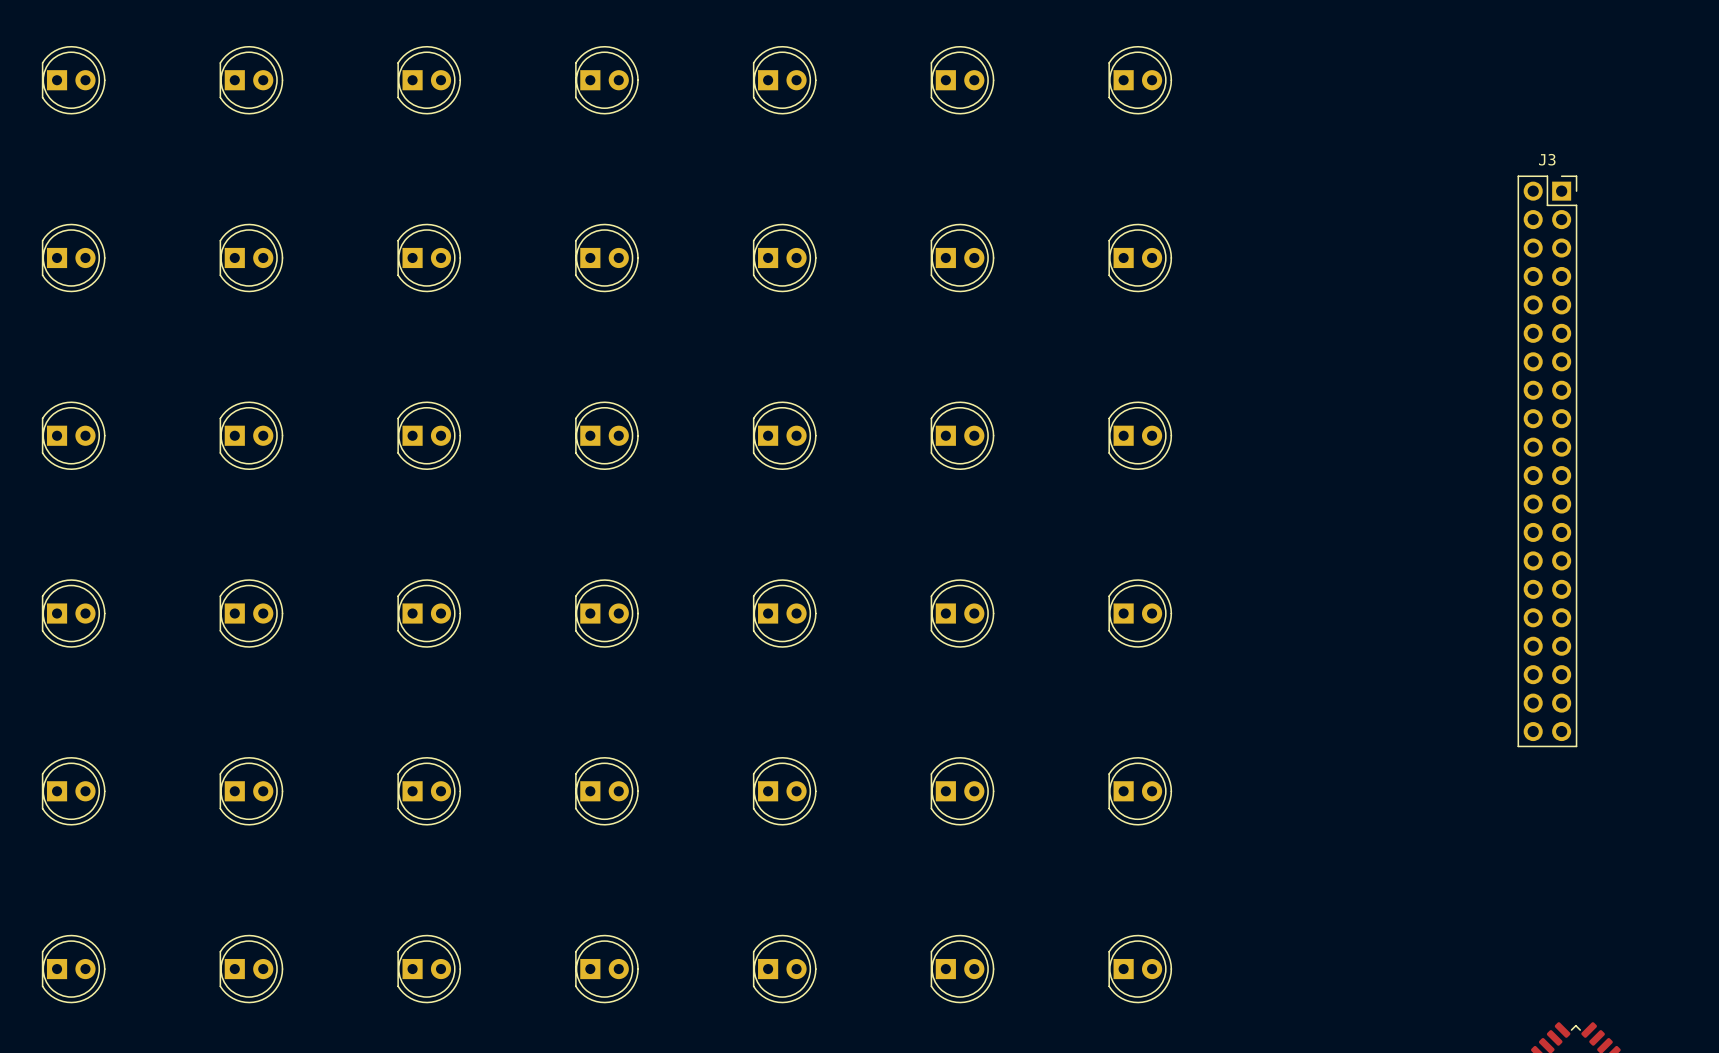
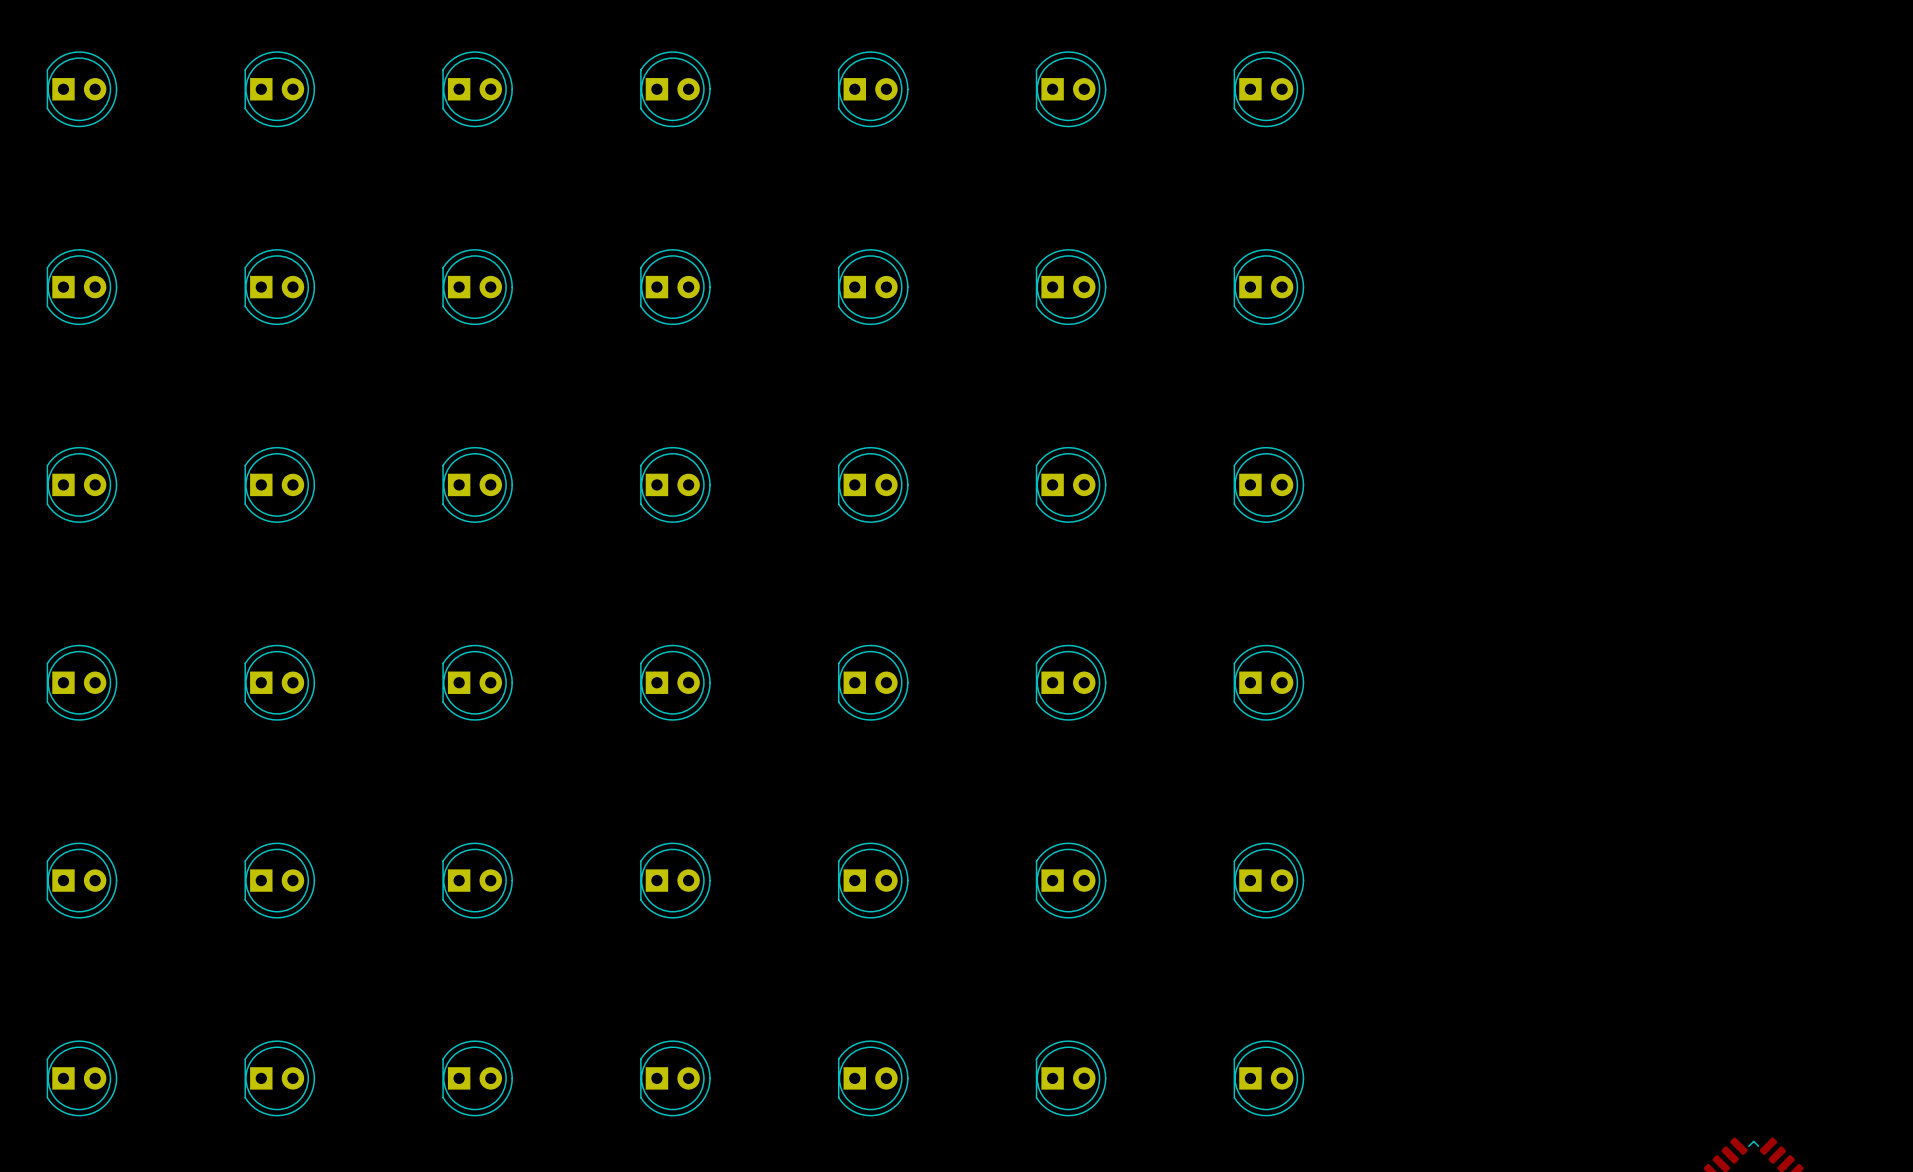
J3: (1547, 461) -> none

